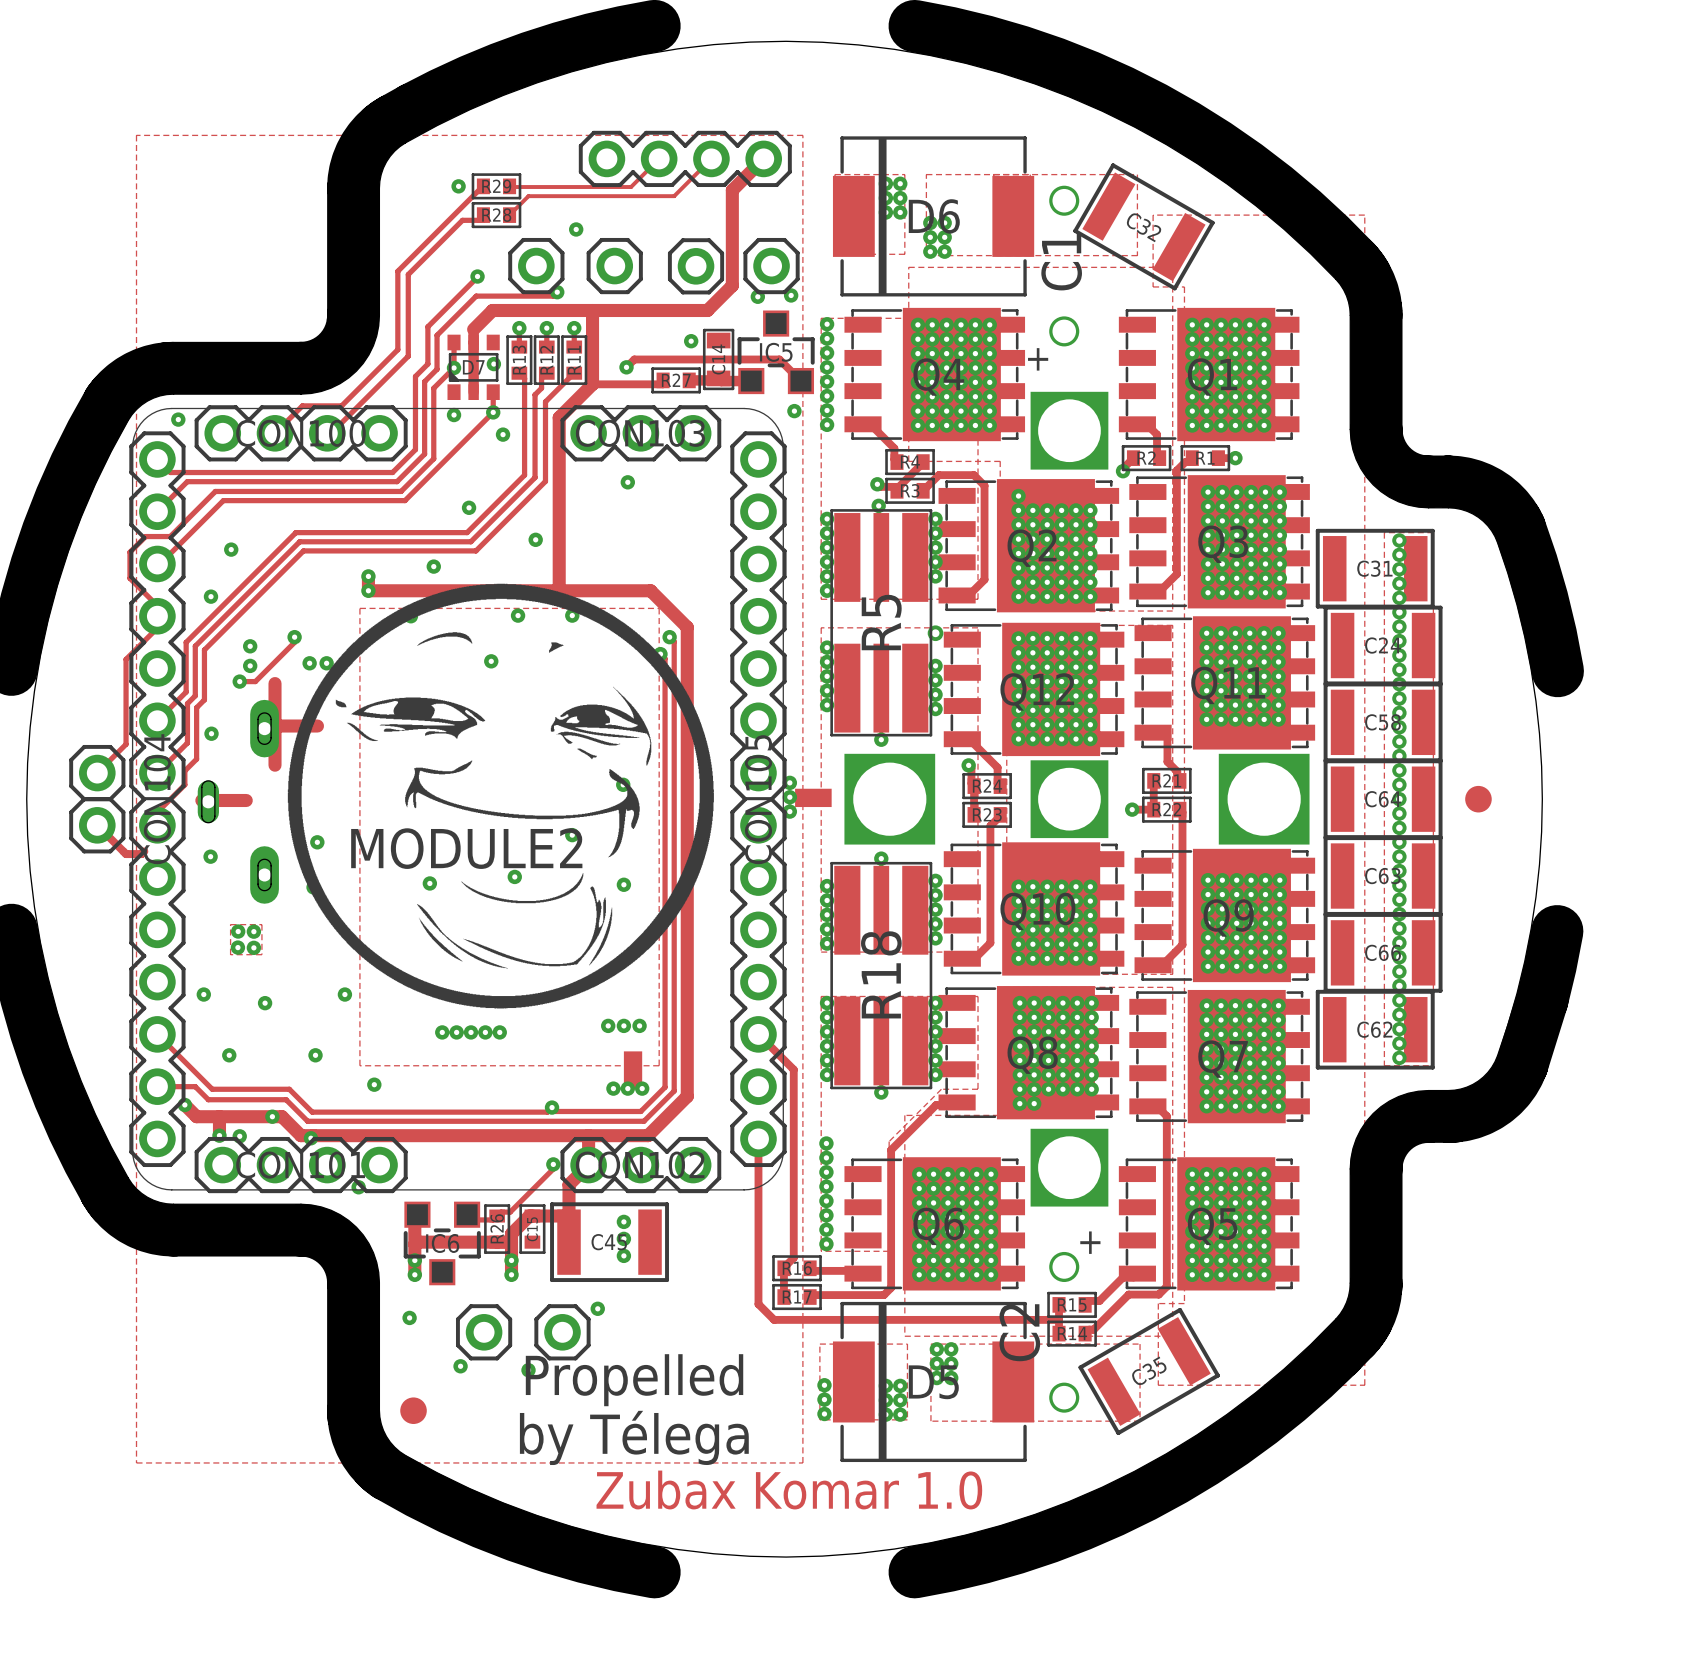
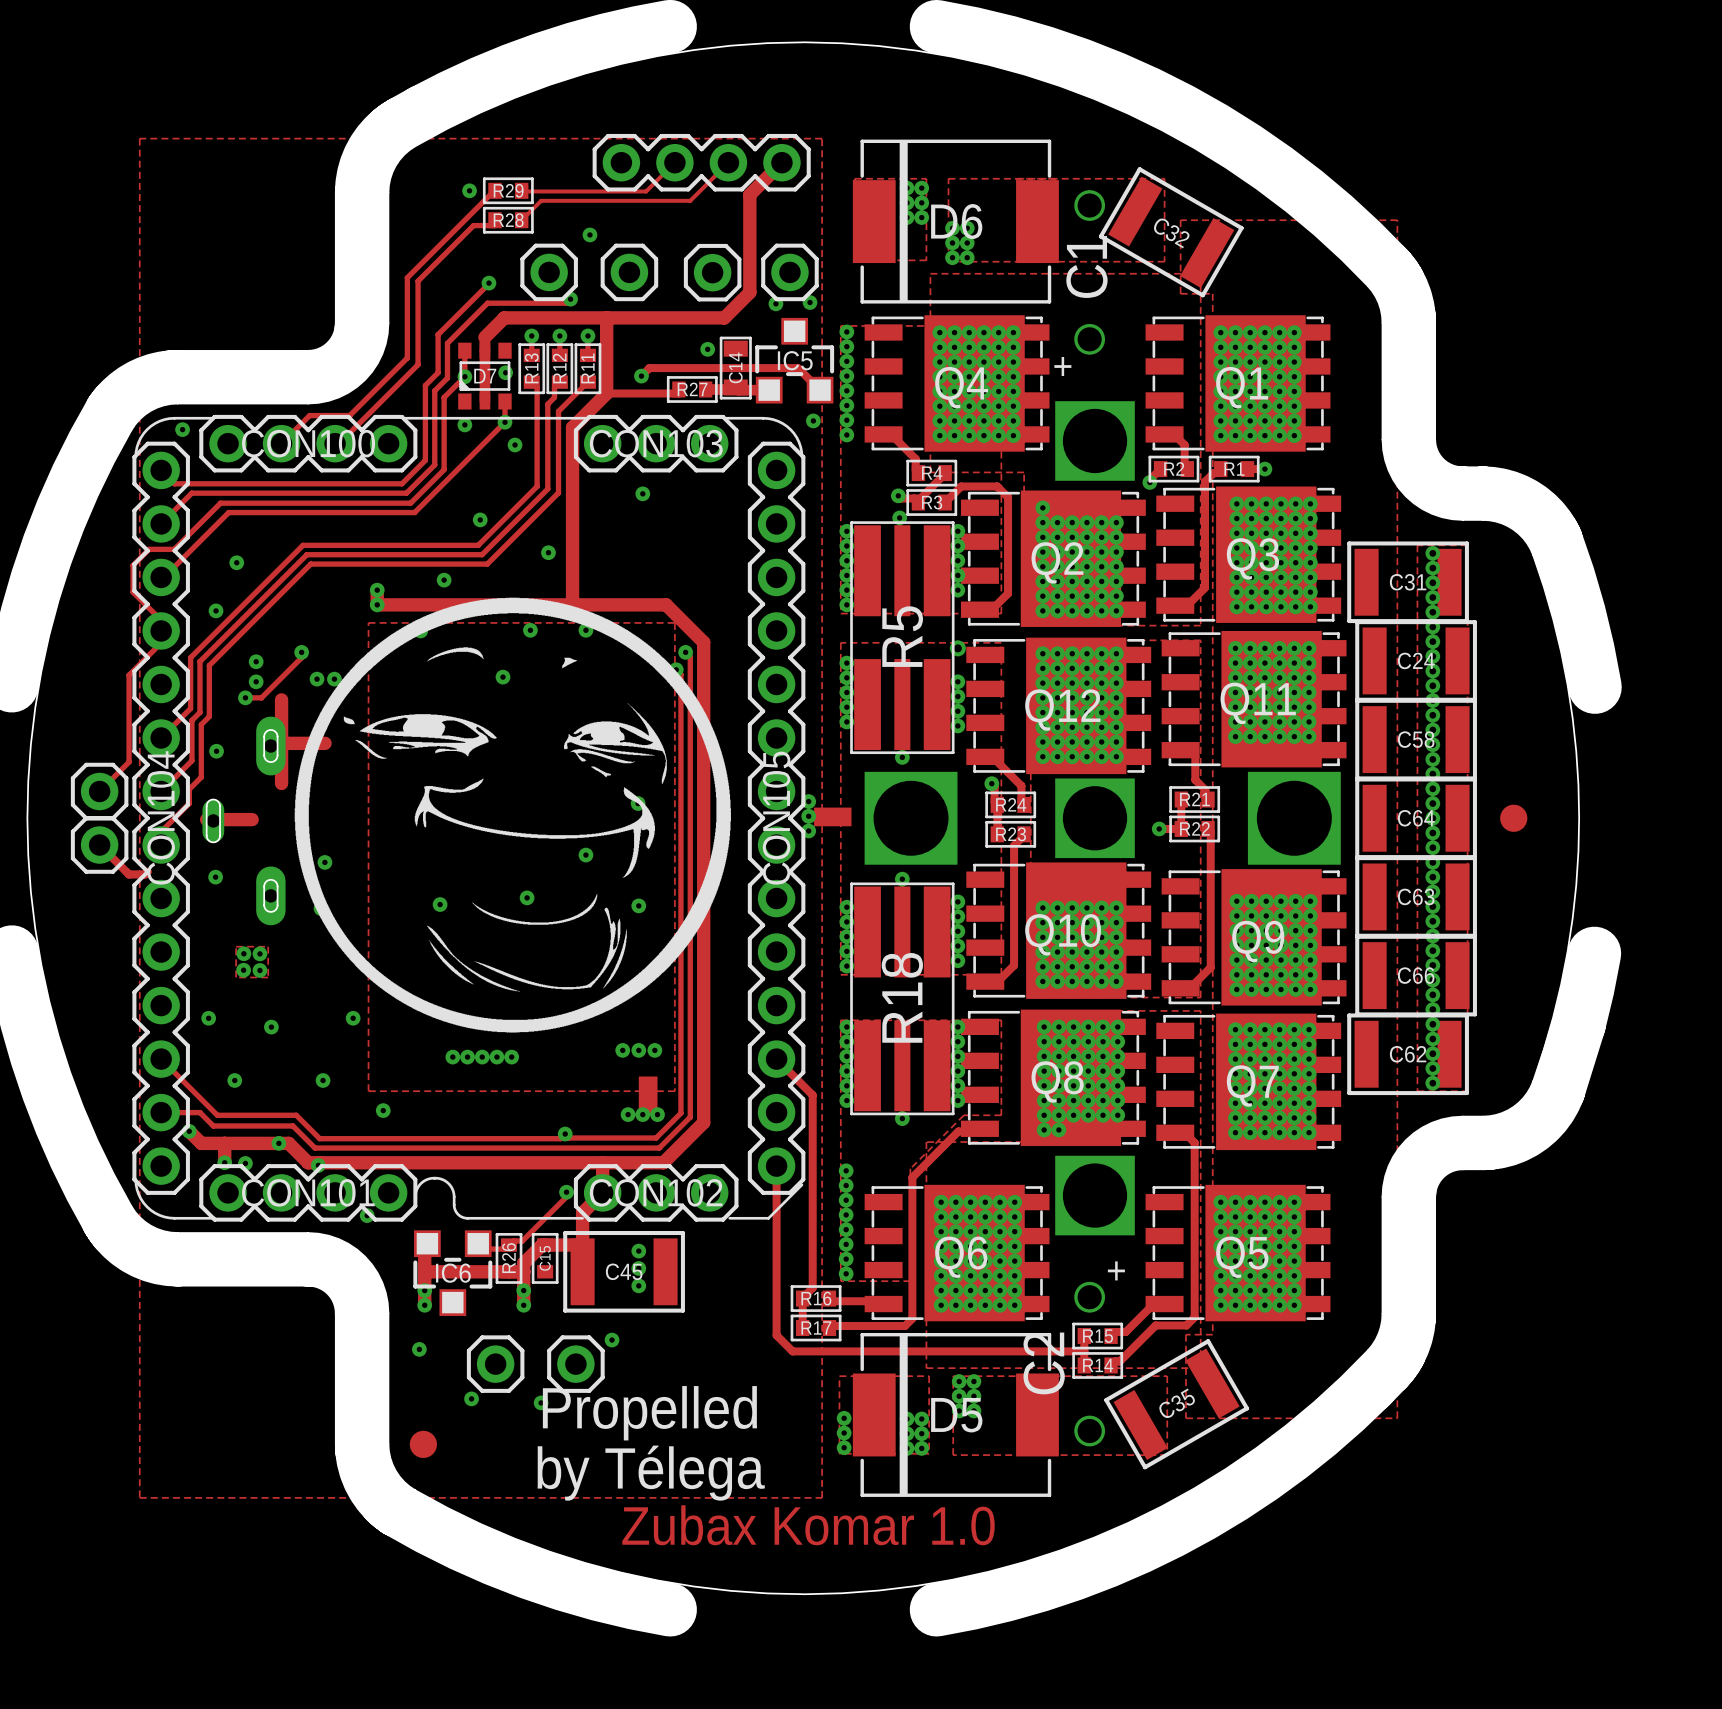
MODULE2: (457, 799) -> none
part: none -> (468, 818)

